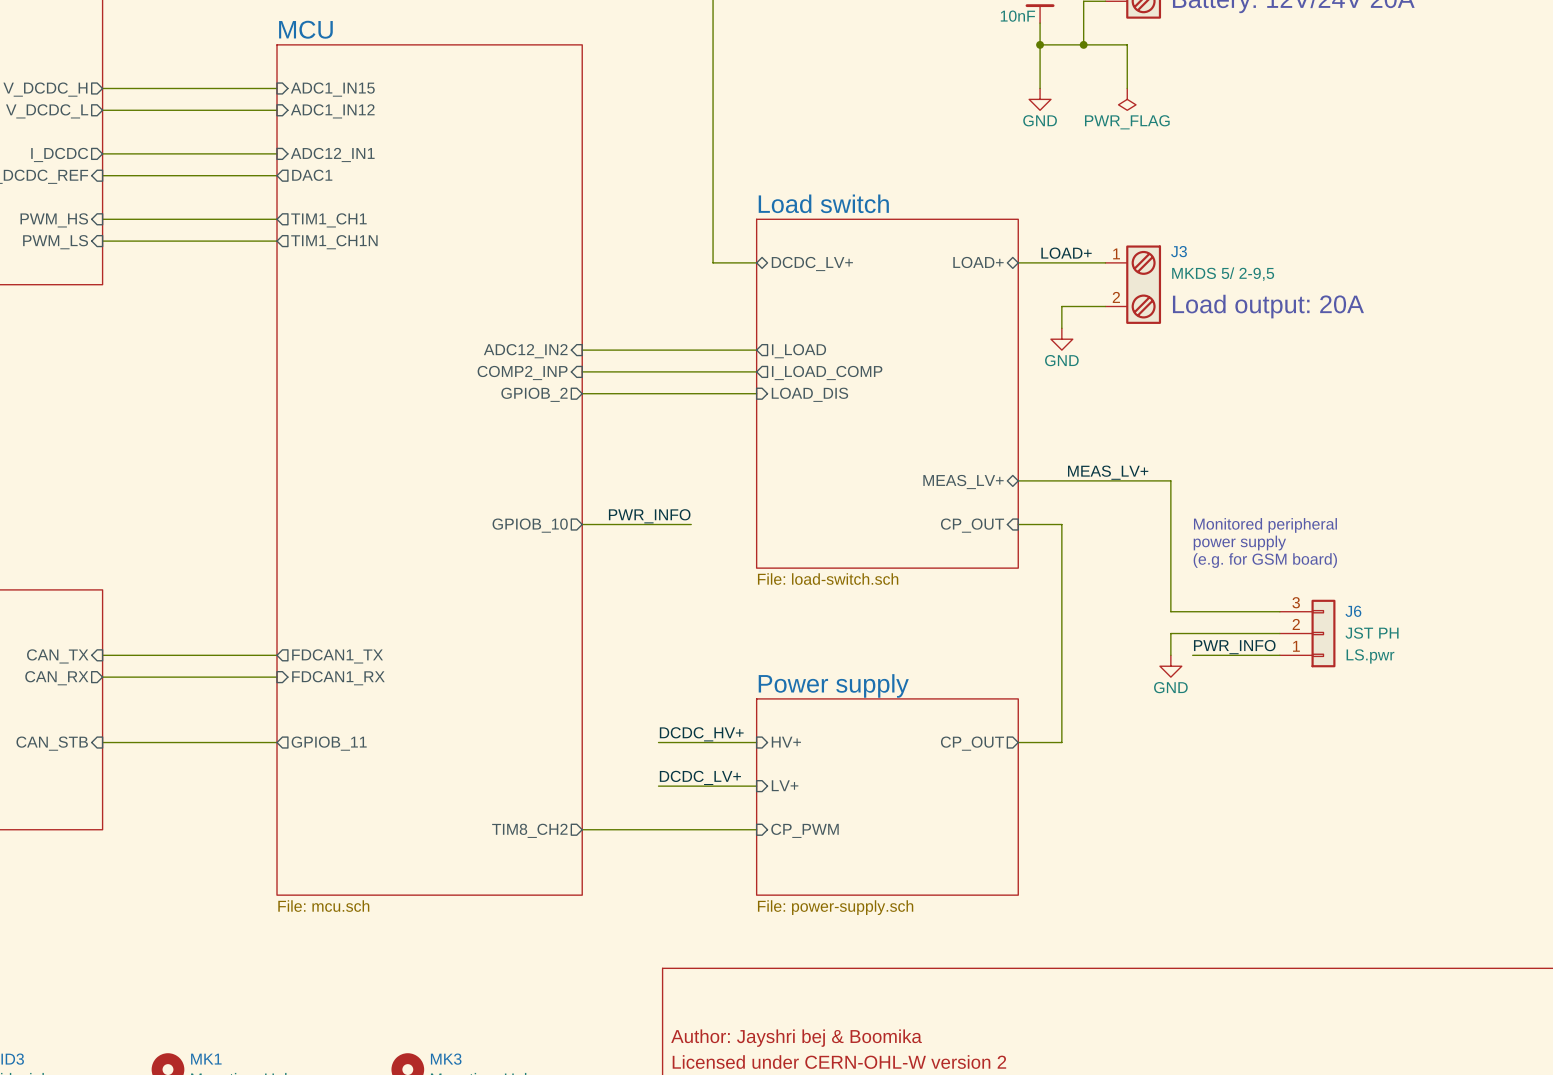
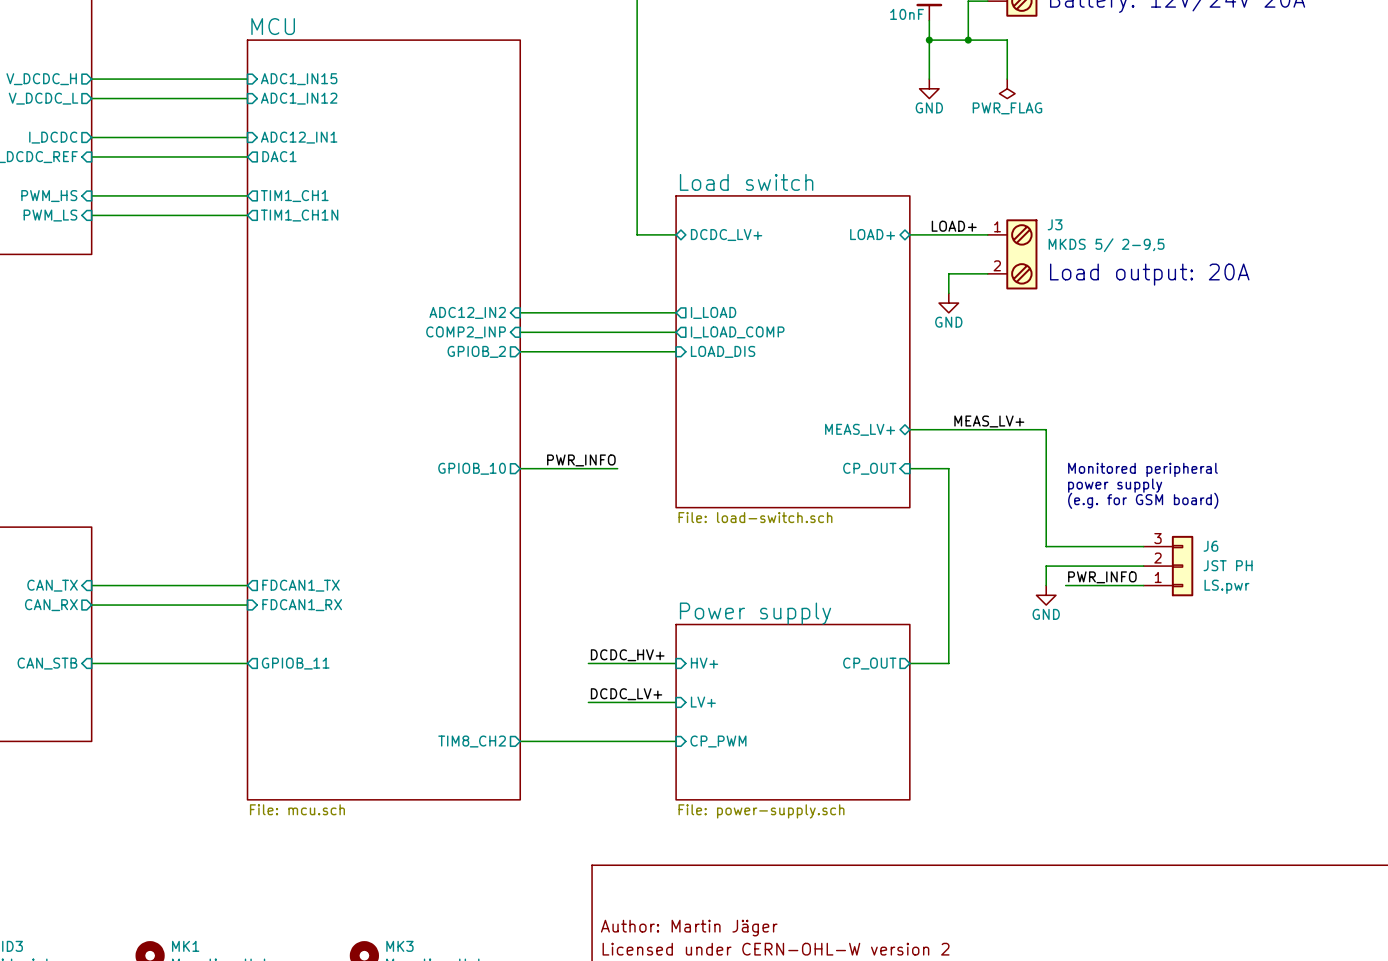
title block: Author: Jayshri bej & Boomika (796, 1038) -> Author: Martin Jäger (689, 928)

